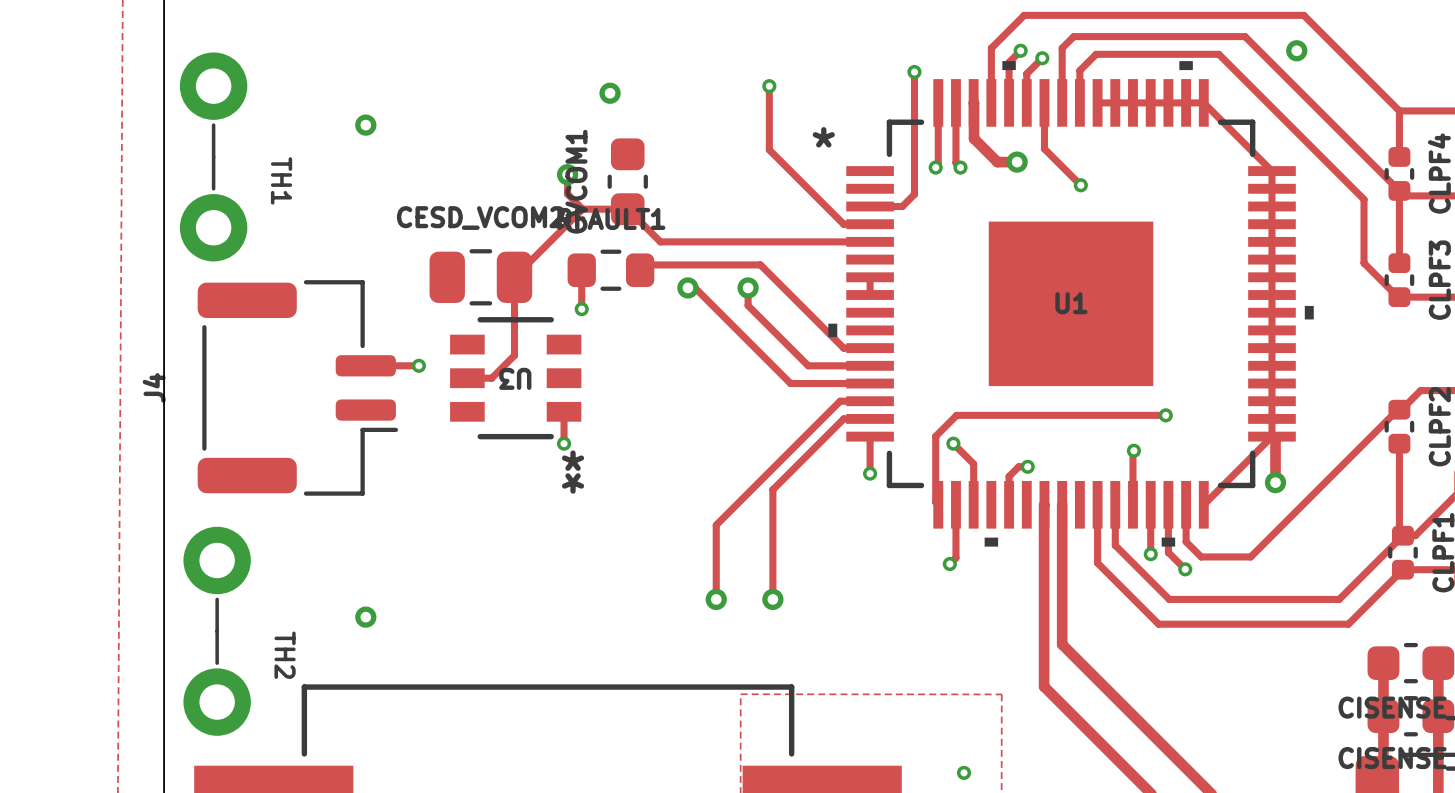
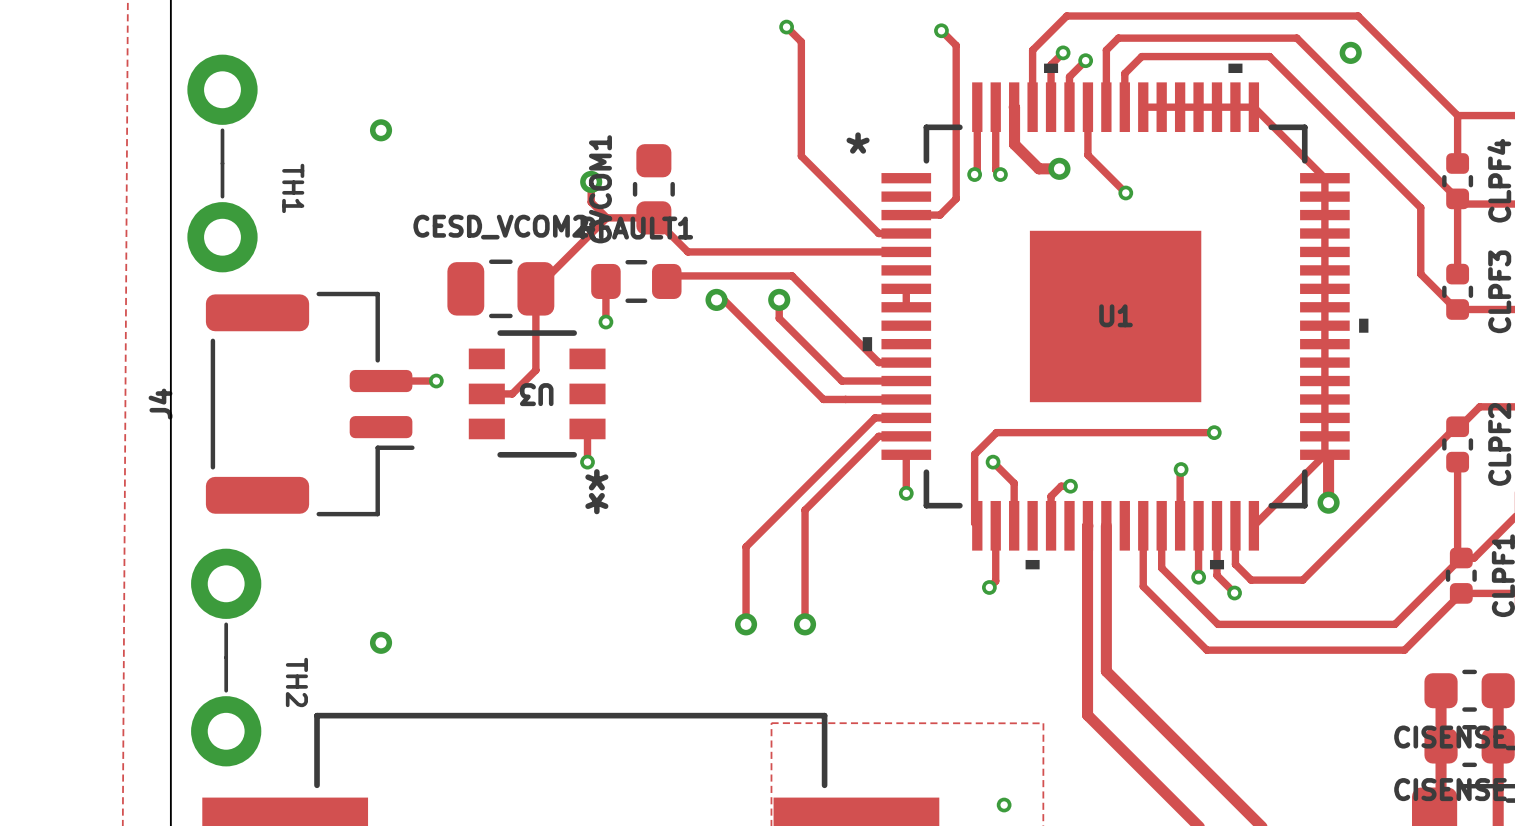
track: none -> (786, 27) (801, 41) (801, 89)
track: (914, 72) (914, 194) -> (941, 30) (956, 45) (956, 198) (952, 202)
via position: (914, 72) -> (941, 30)
via position: (769, 86) -> (786, 27)
via: (610, 93) -> none

